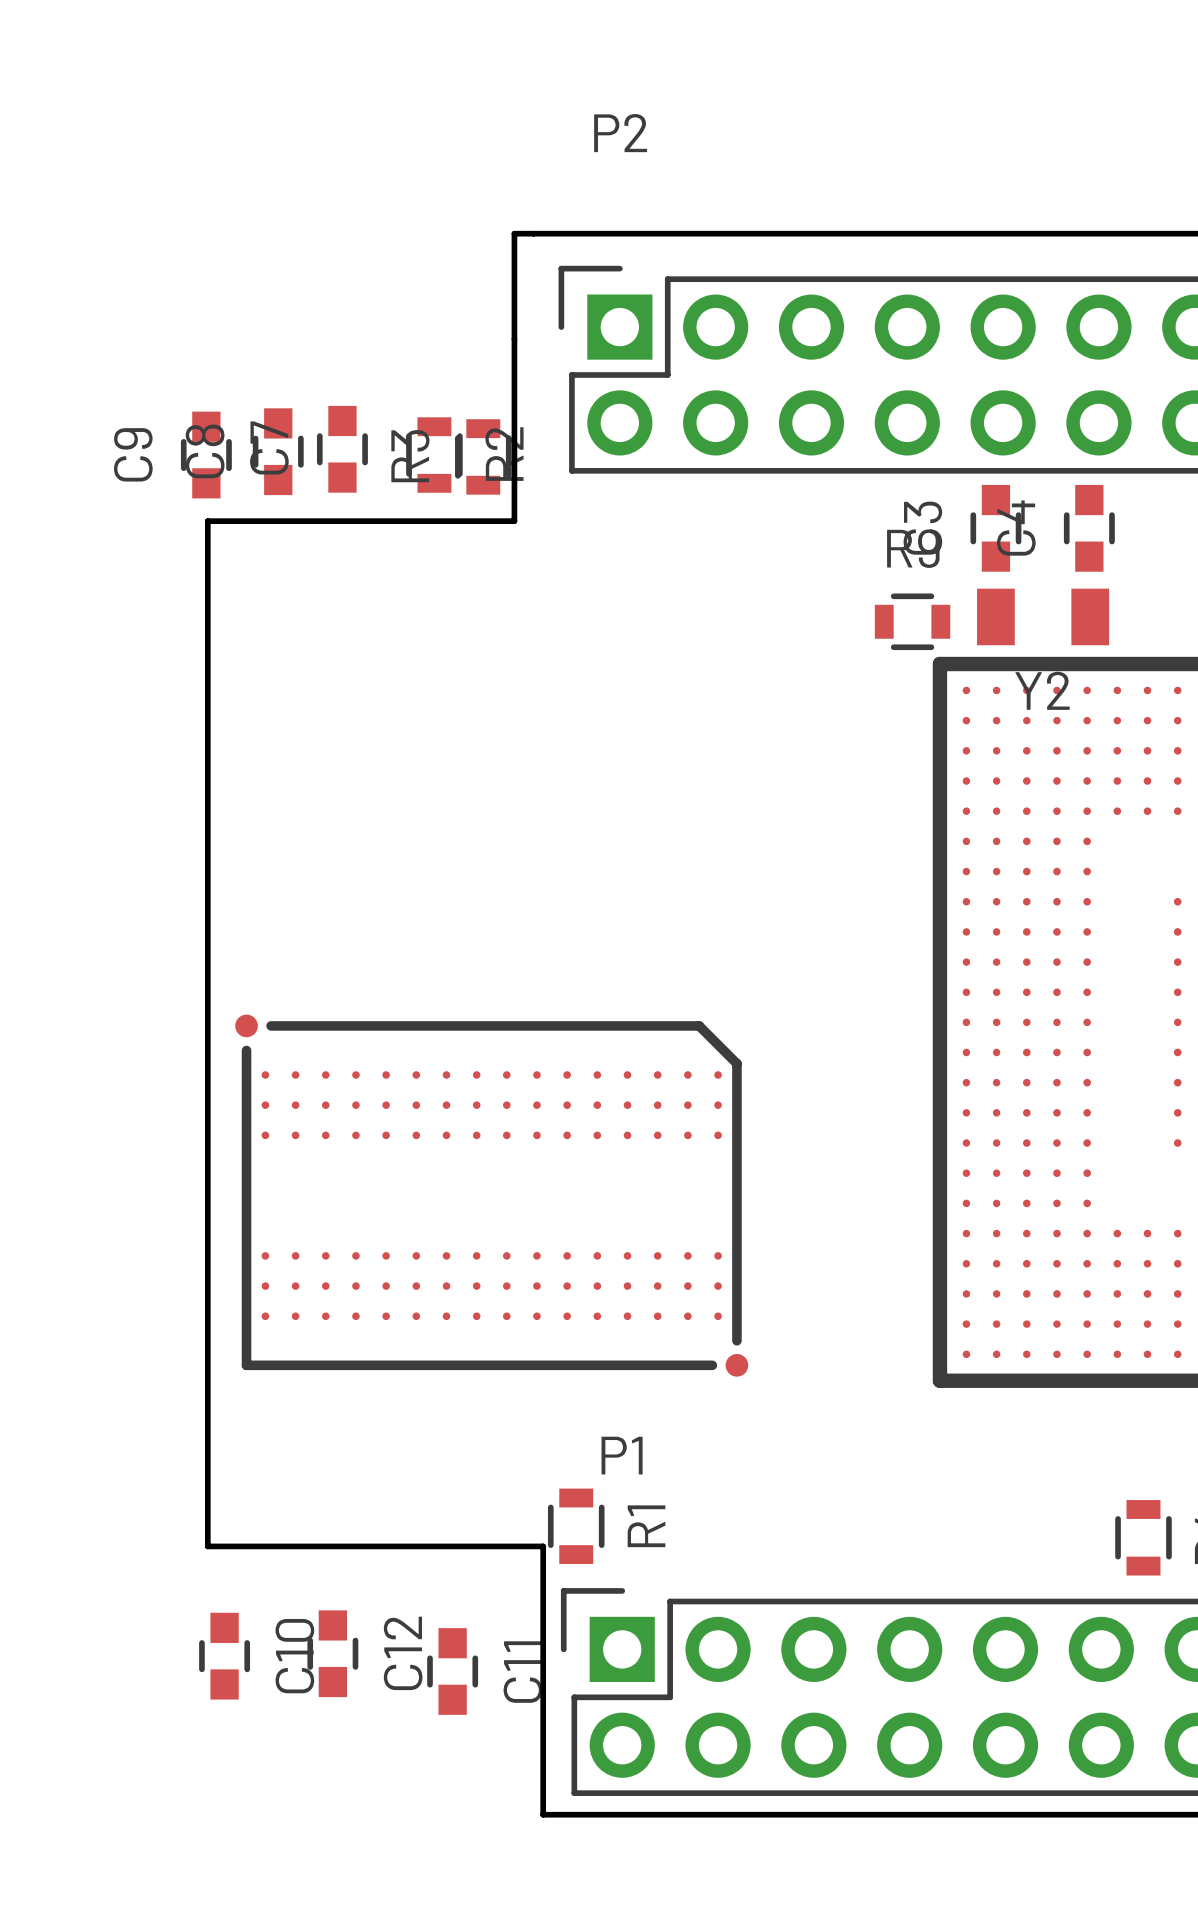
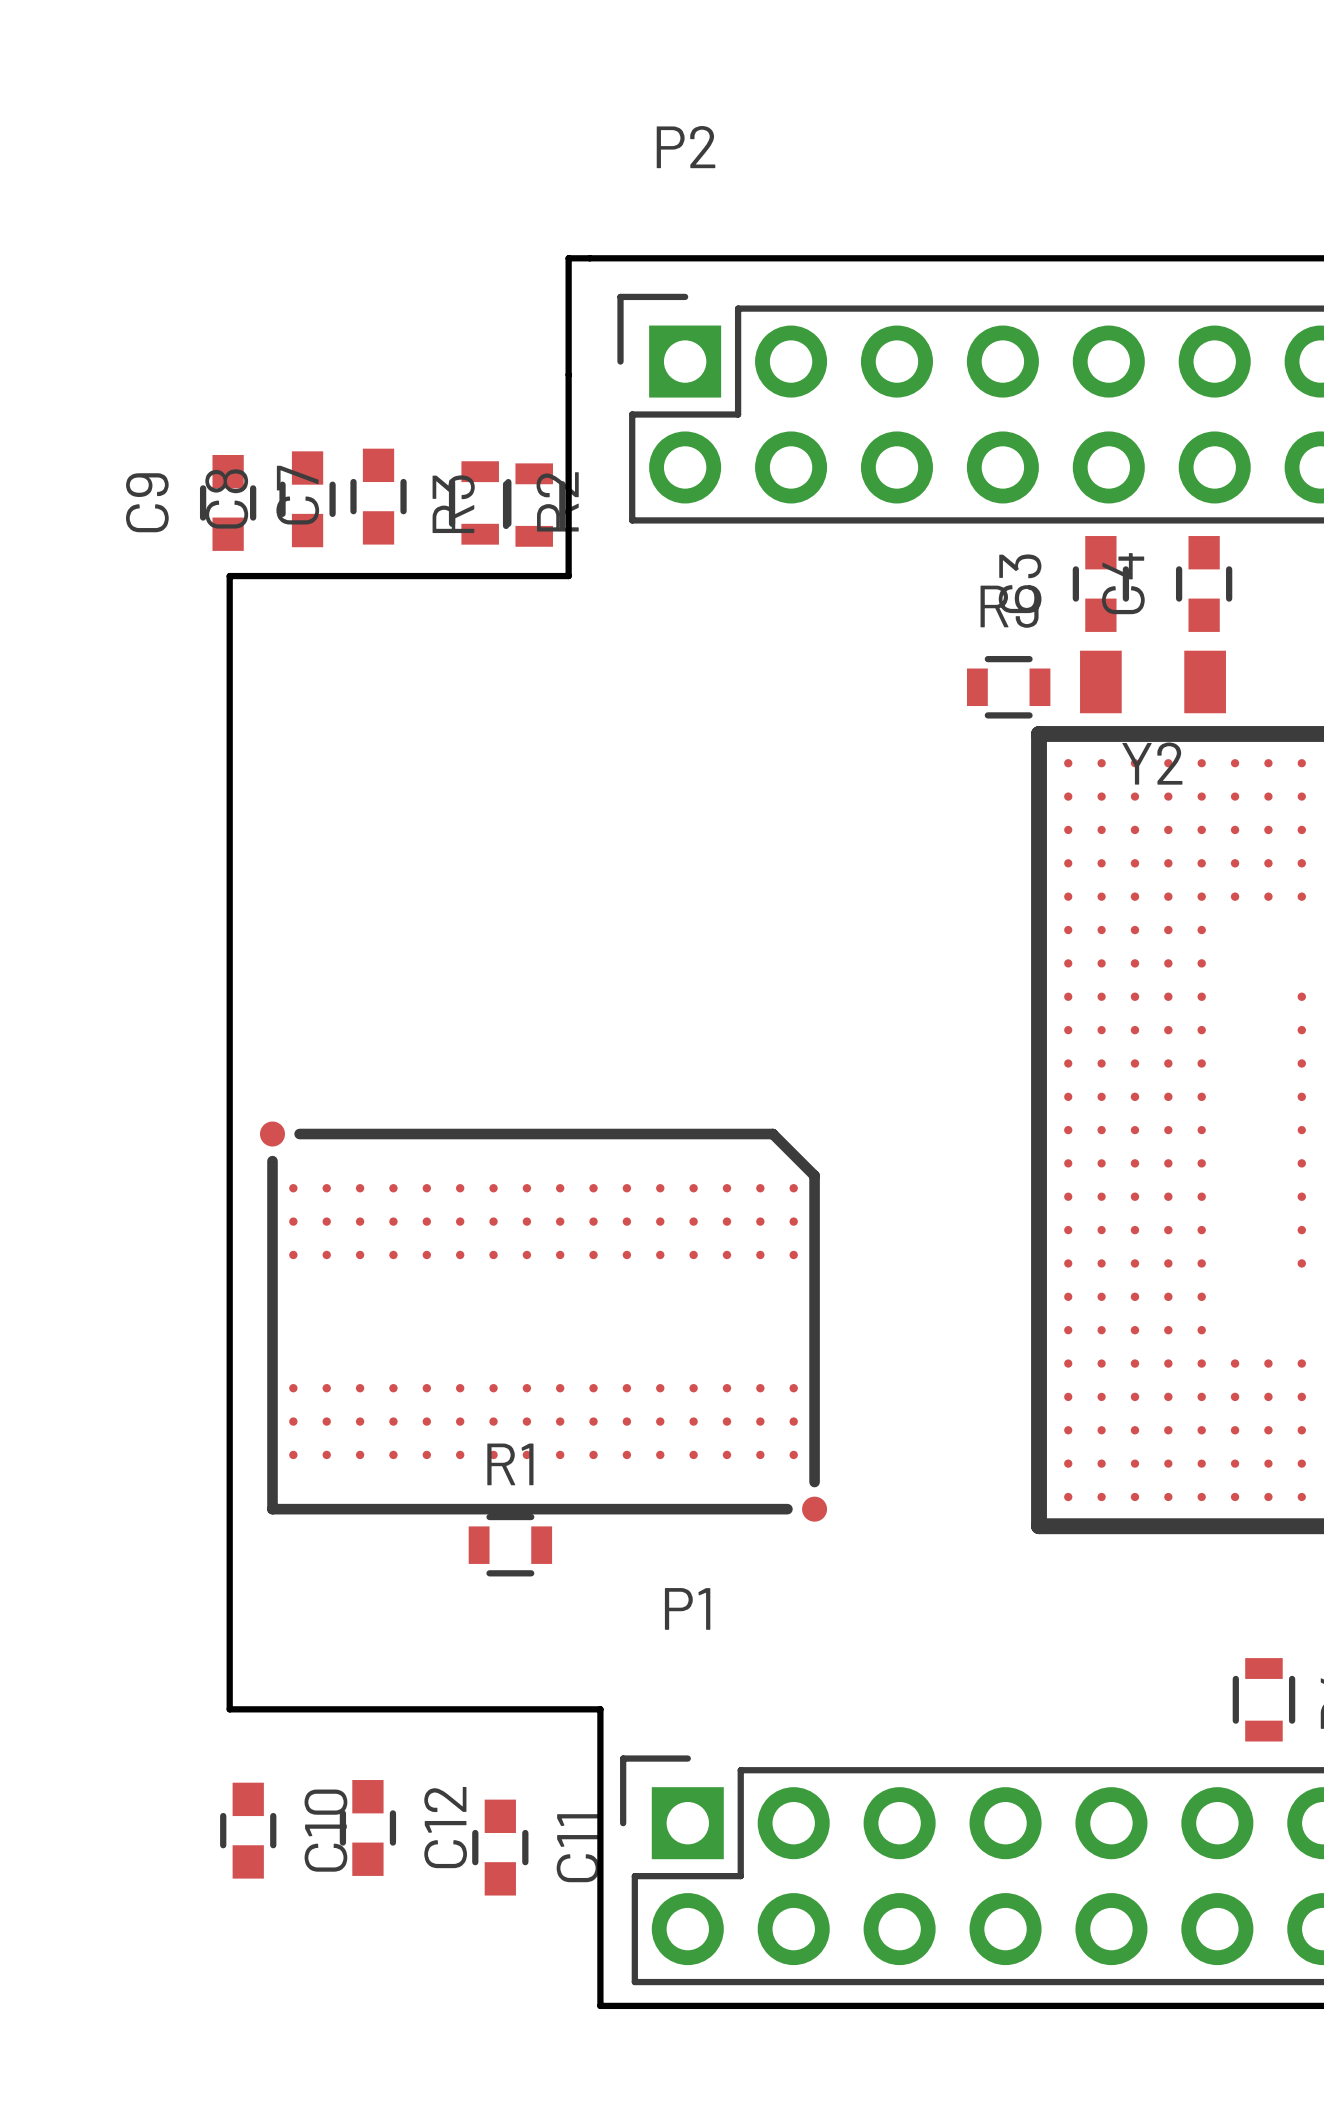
R1 rotation: 0° (576, 1526) -> 90° clockwise (510, 1545)
R1 position: (576, 1526) -> (510, 1545)
R1 name position: R1 (646, 1526) -> R1 (510, 1464)

